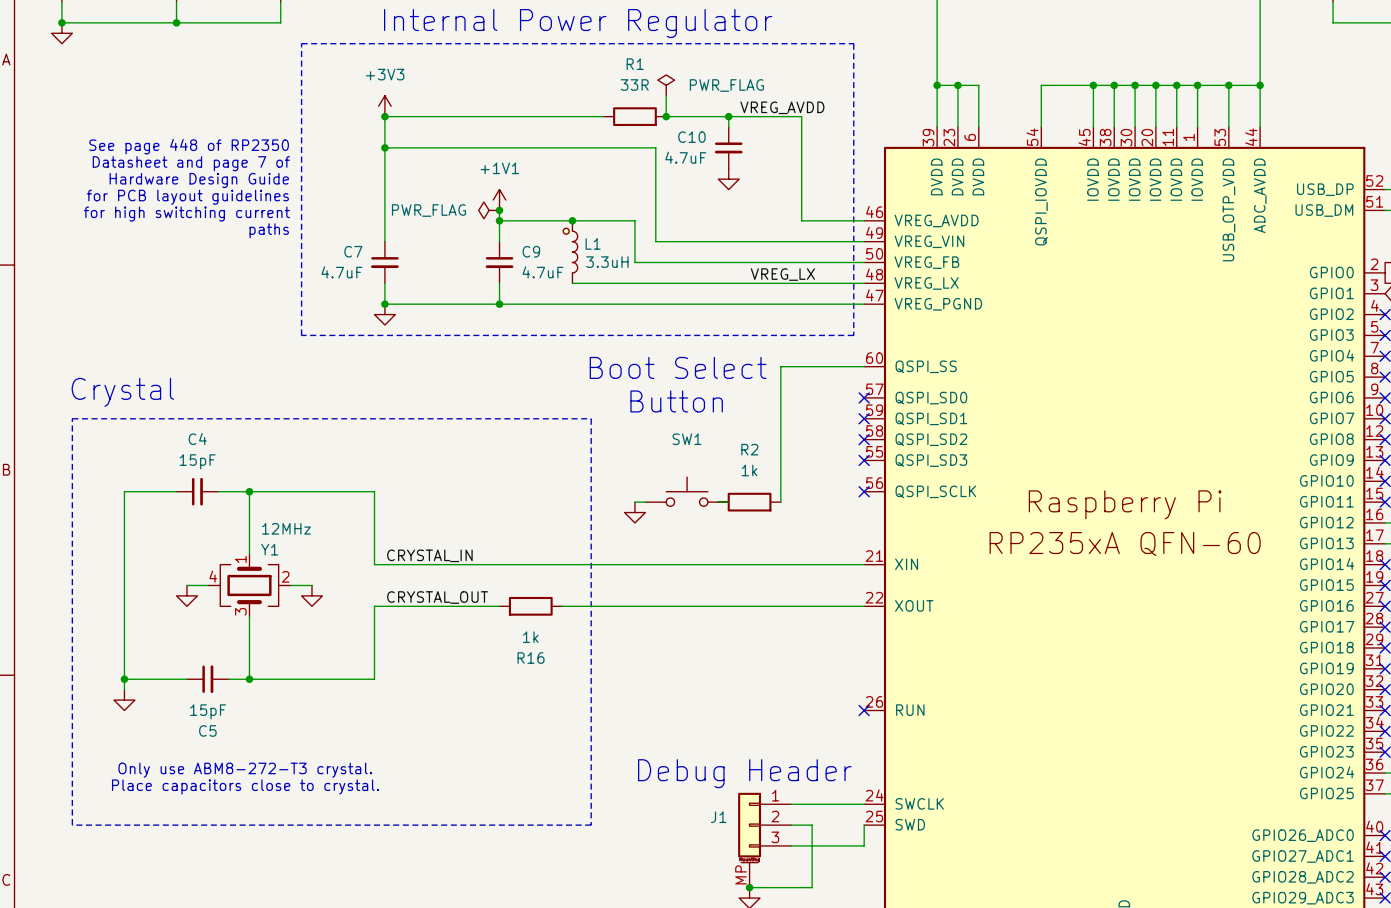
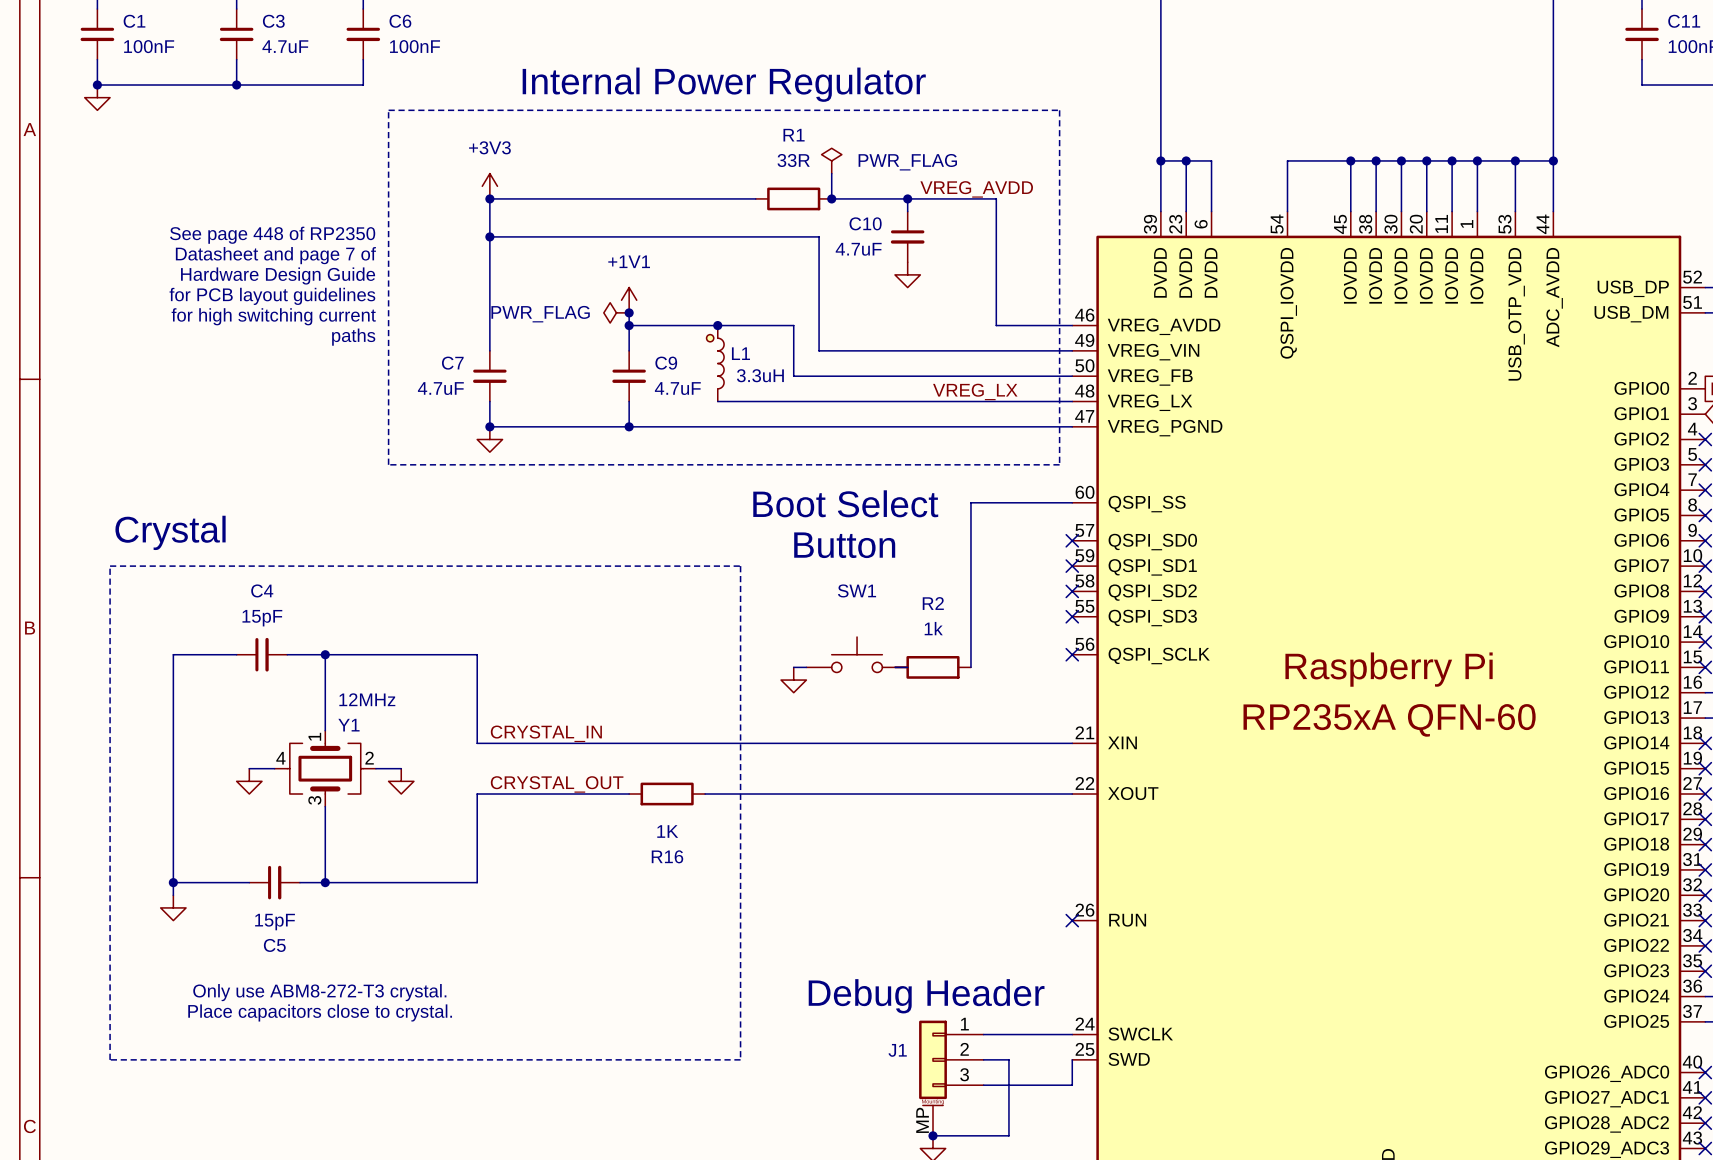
R16 text: 1k (530, 637) -> 1K (667, 831)

